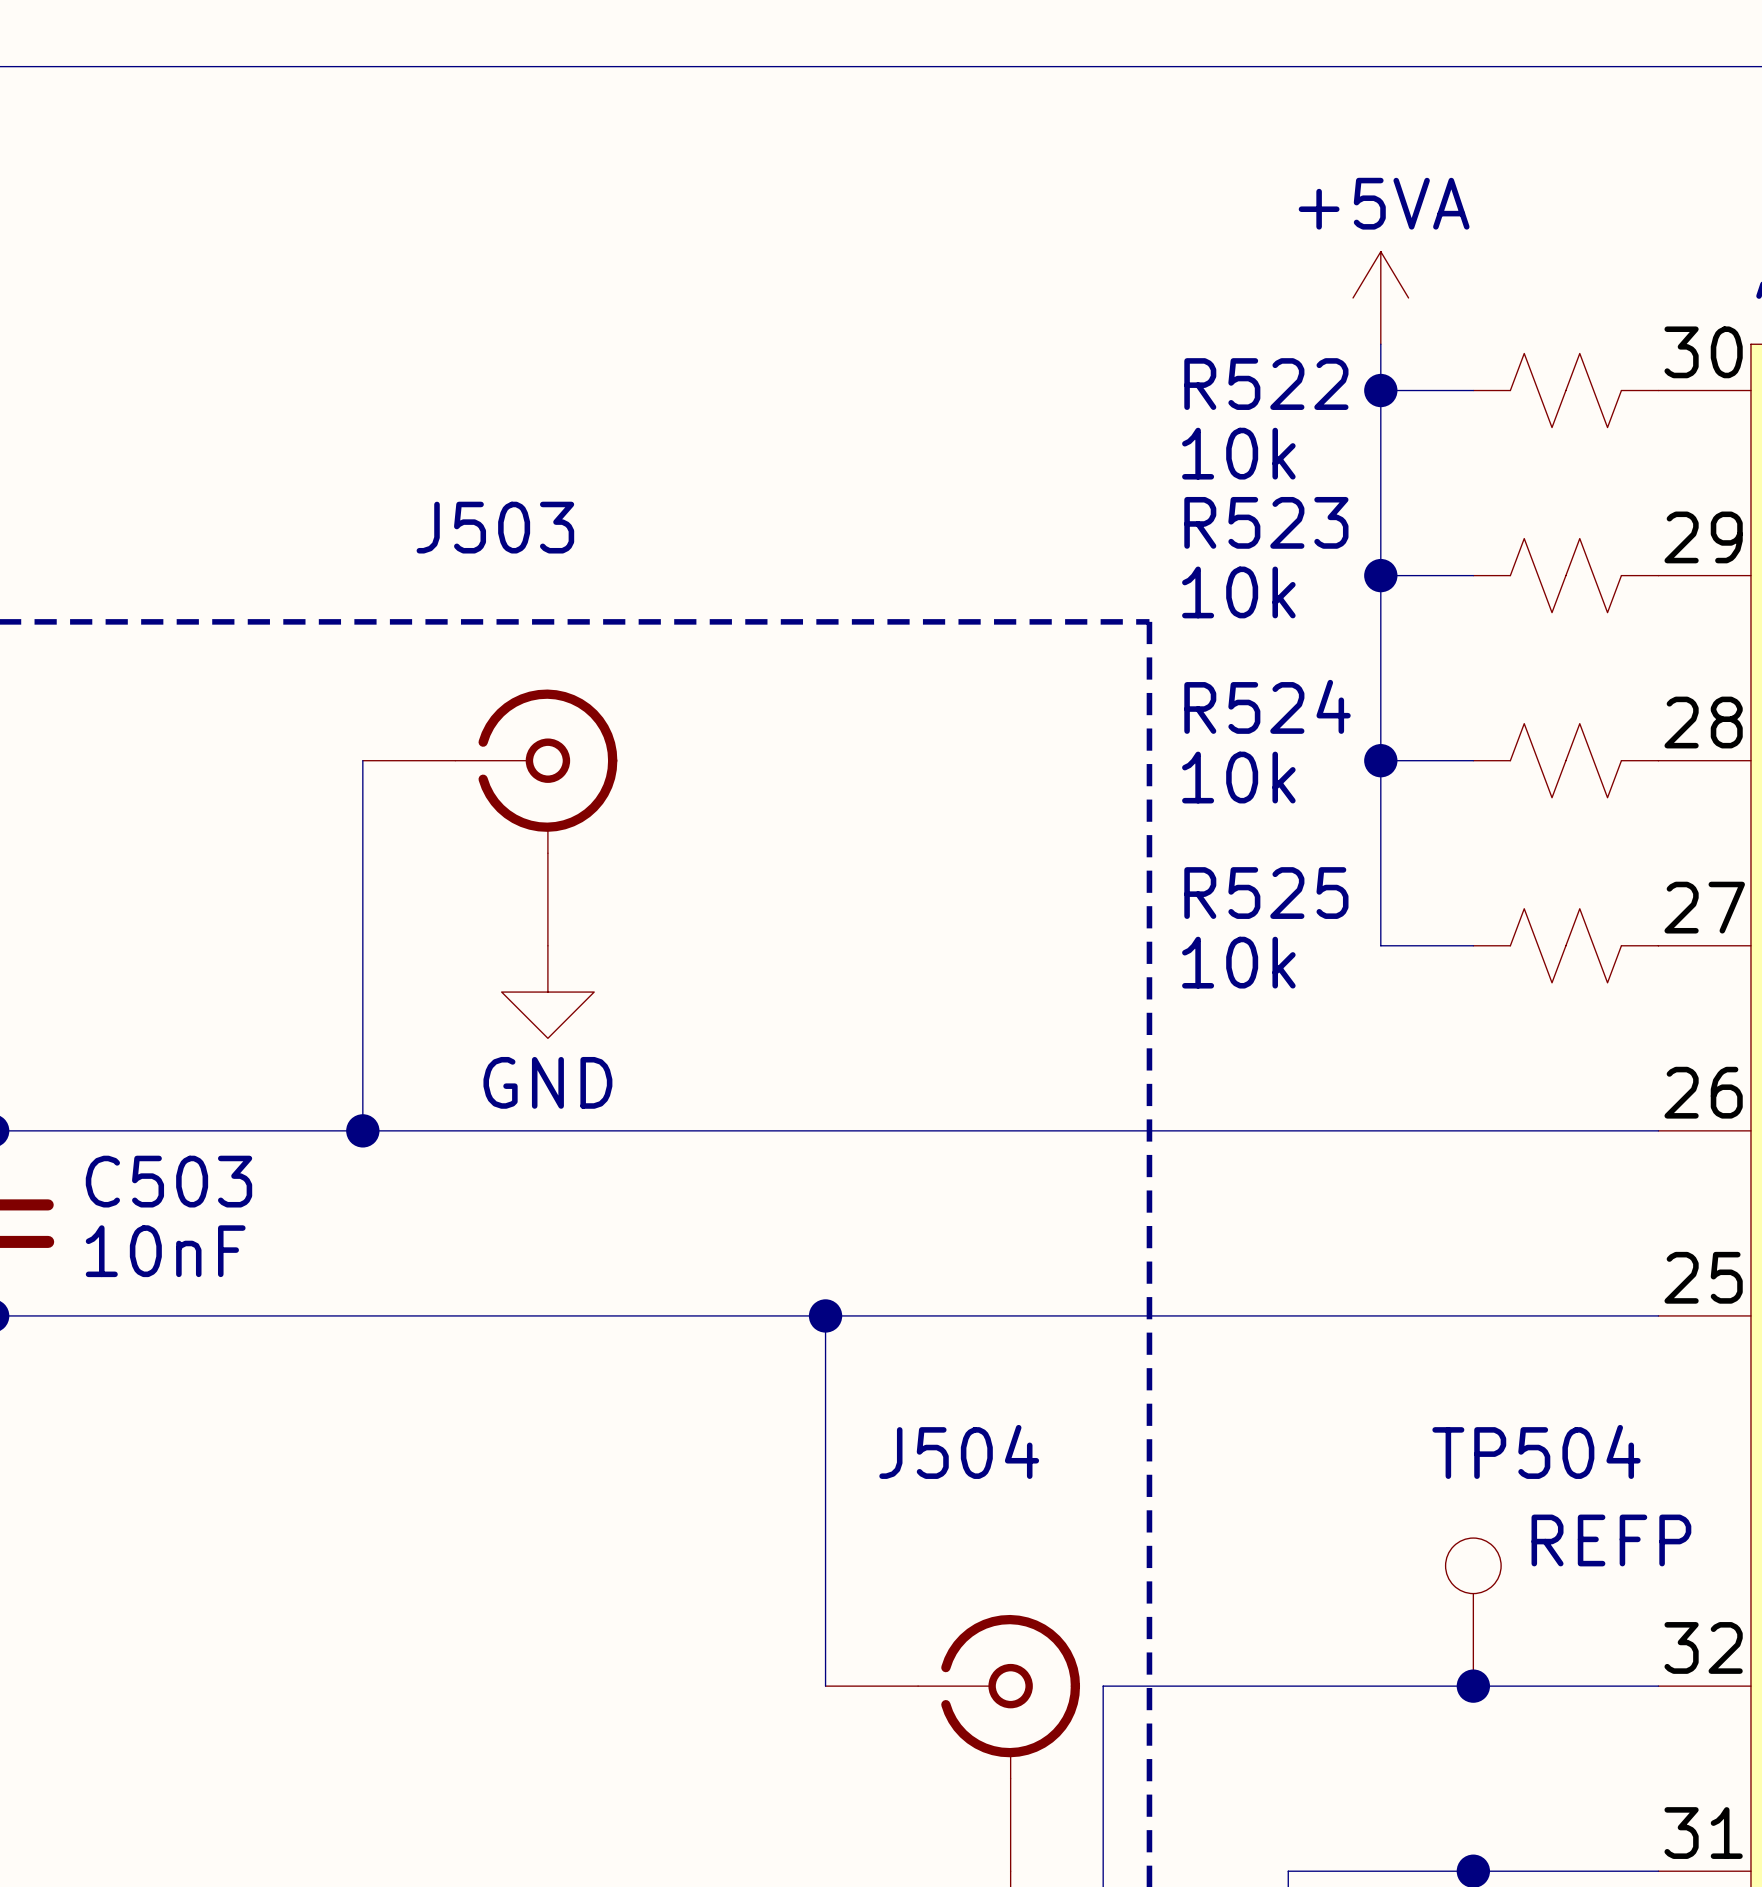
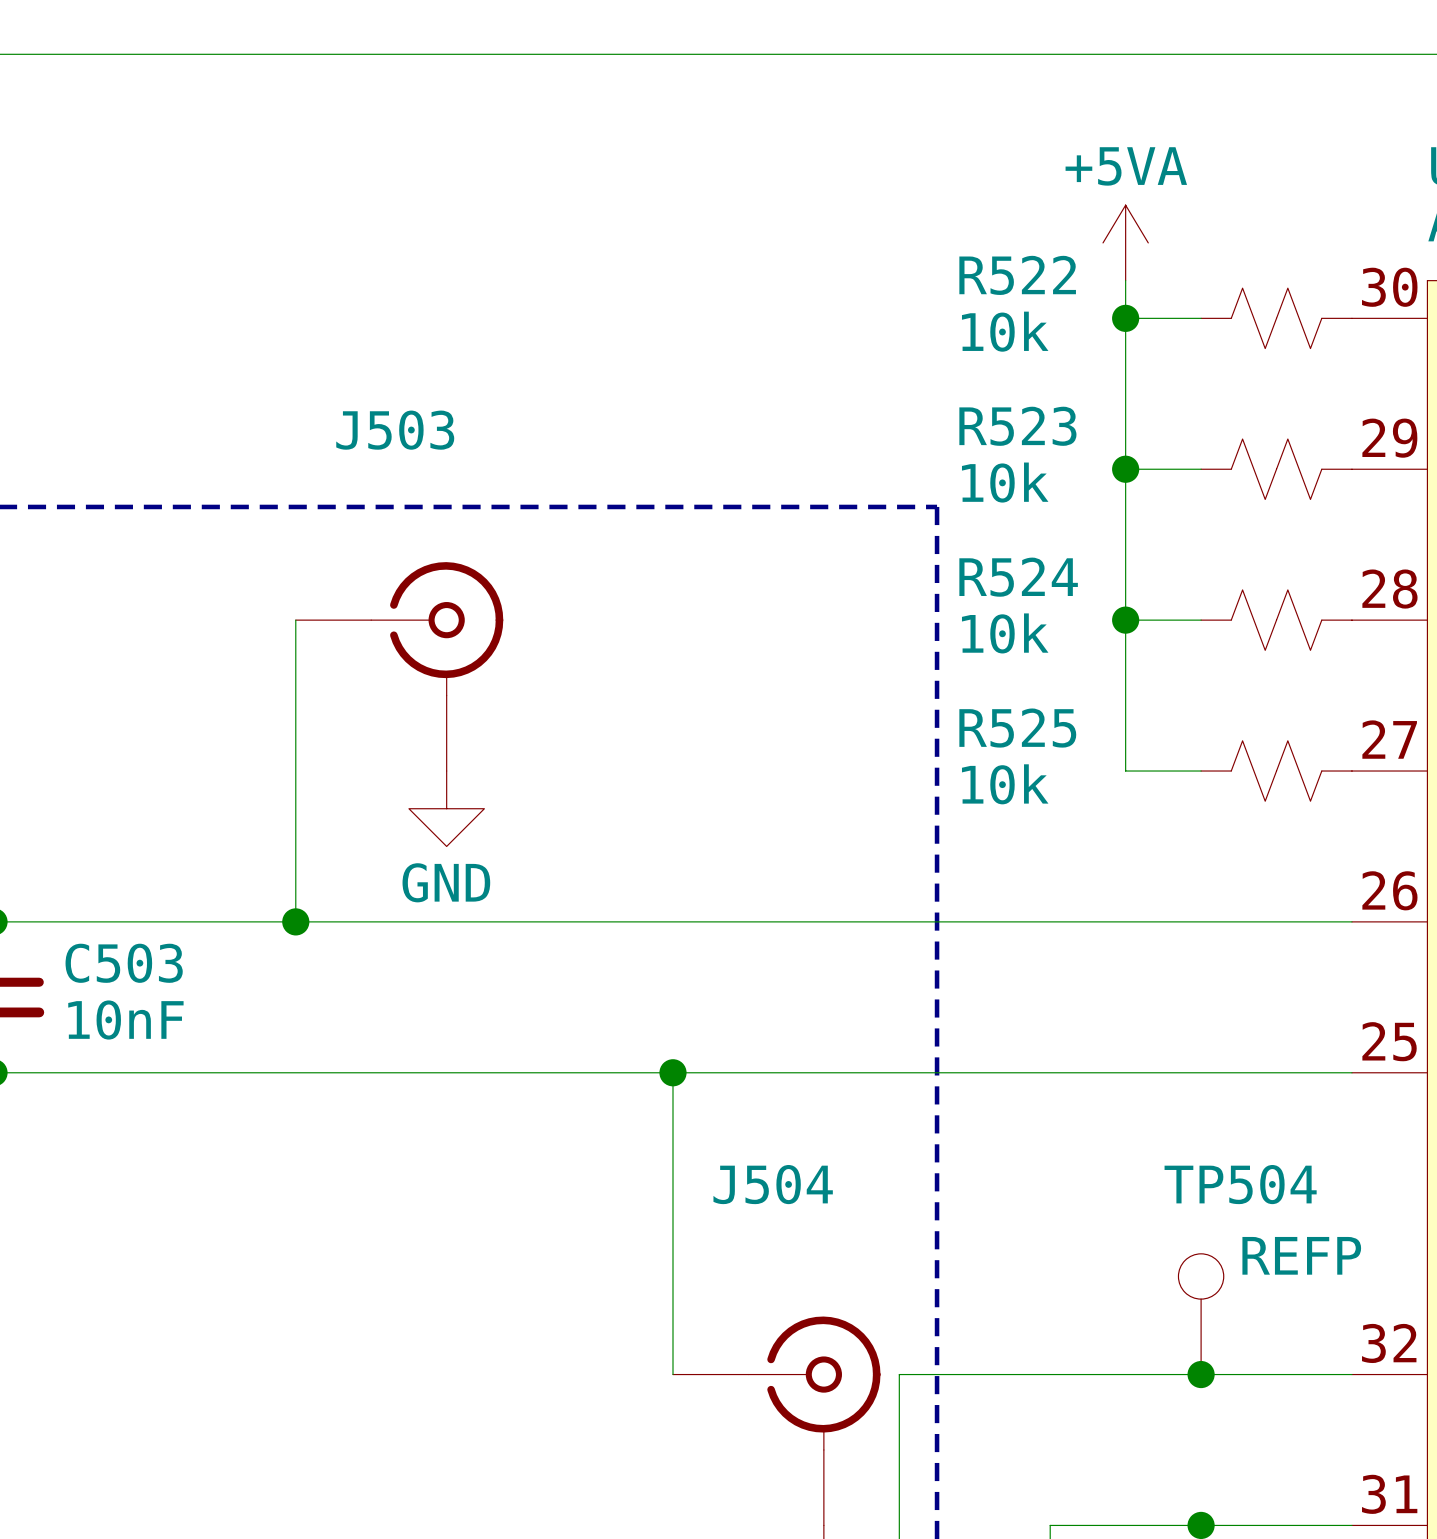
R522 name position: R522 (1266, 384) -> R522 (1017, 275)
R522 value position: 10k (1238, 453) -> 10k (1005, 331)

